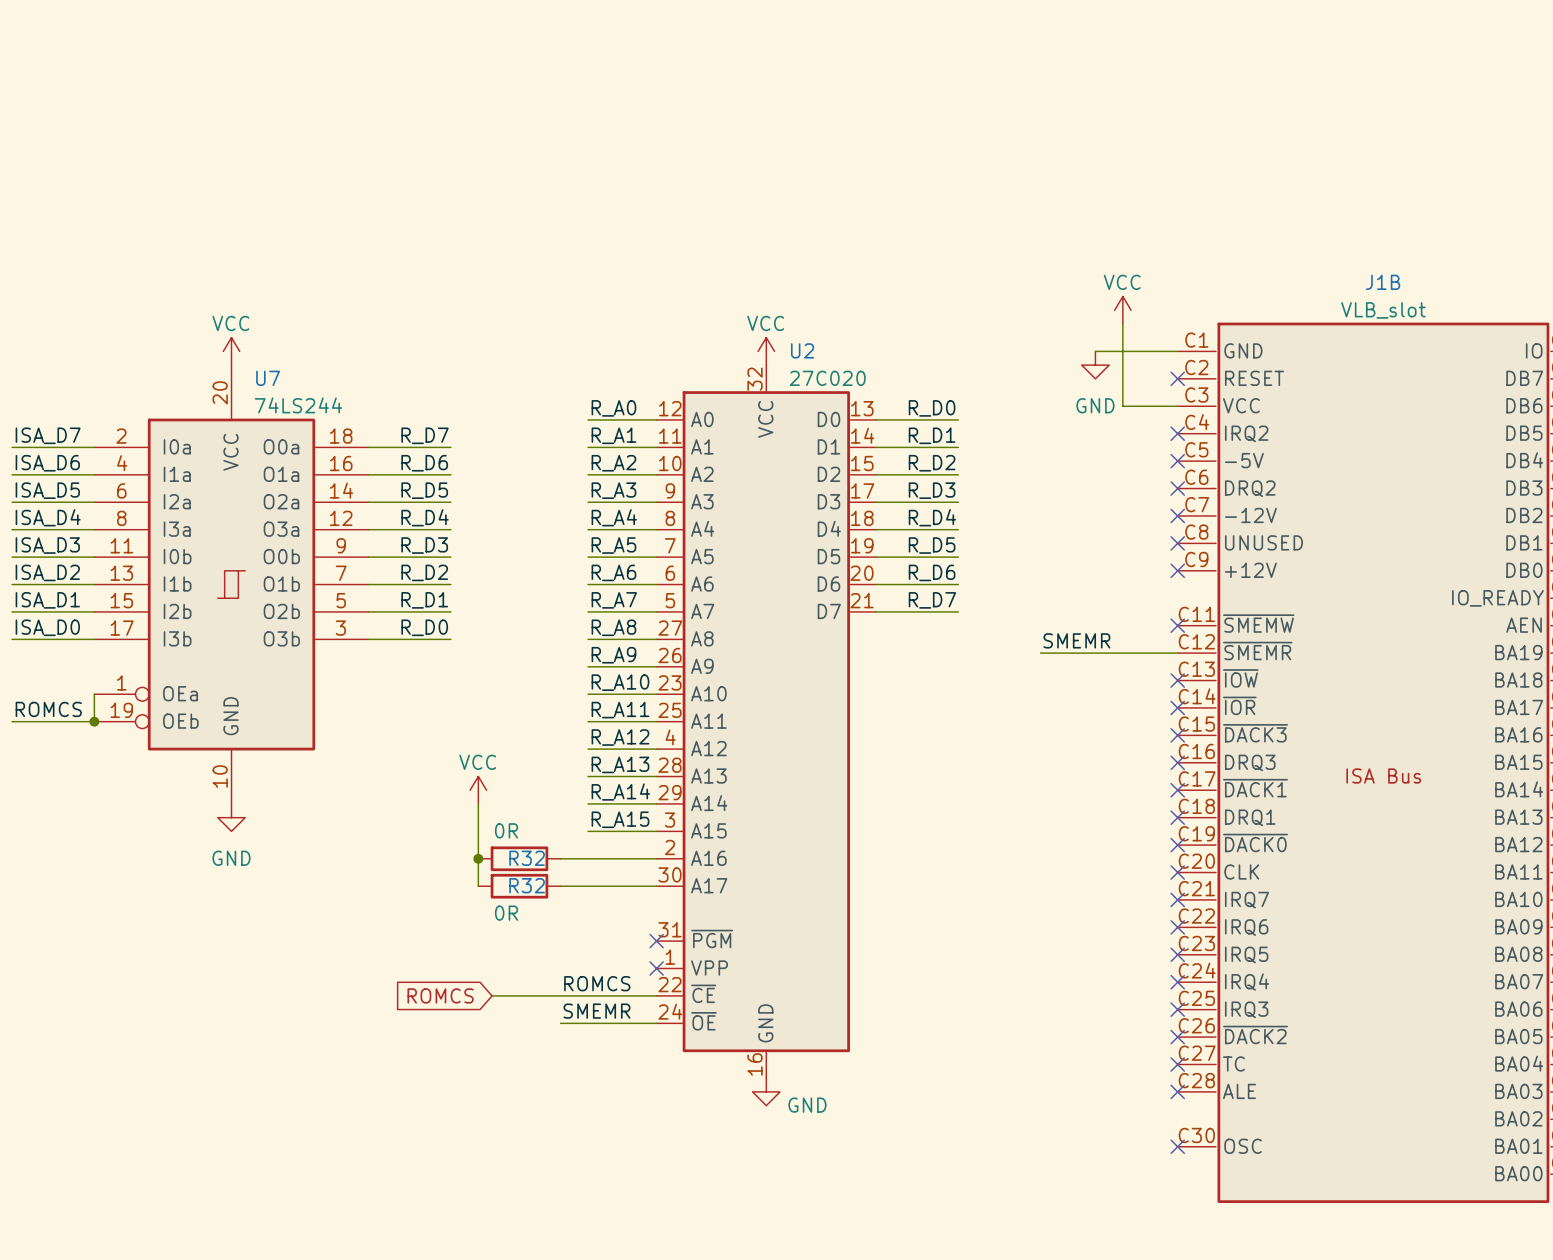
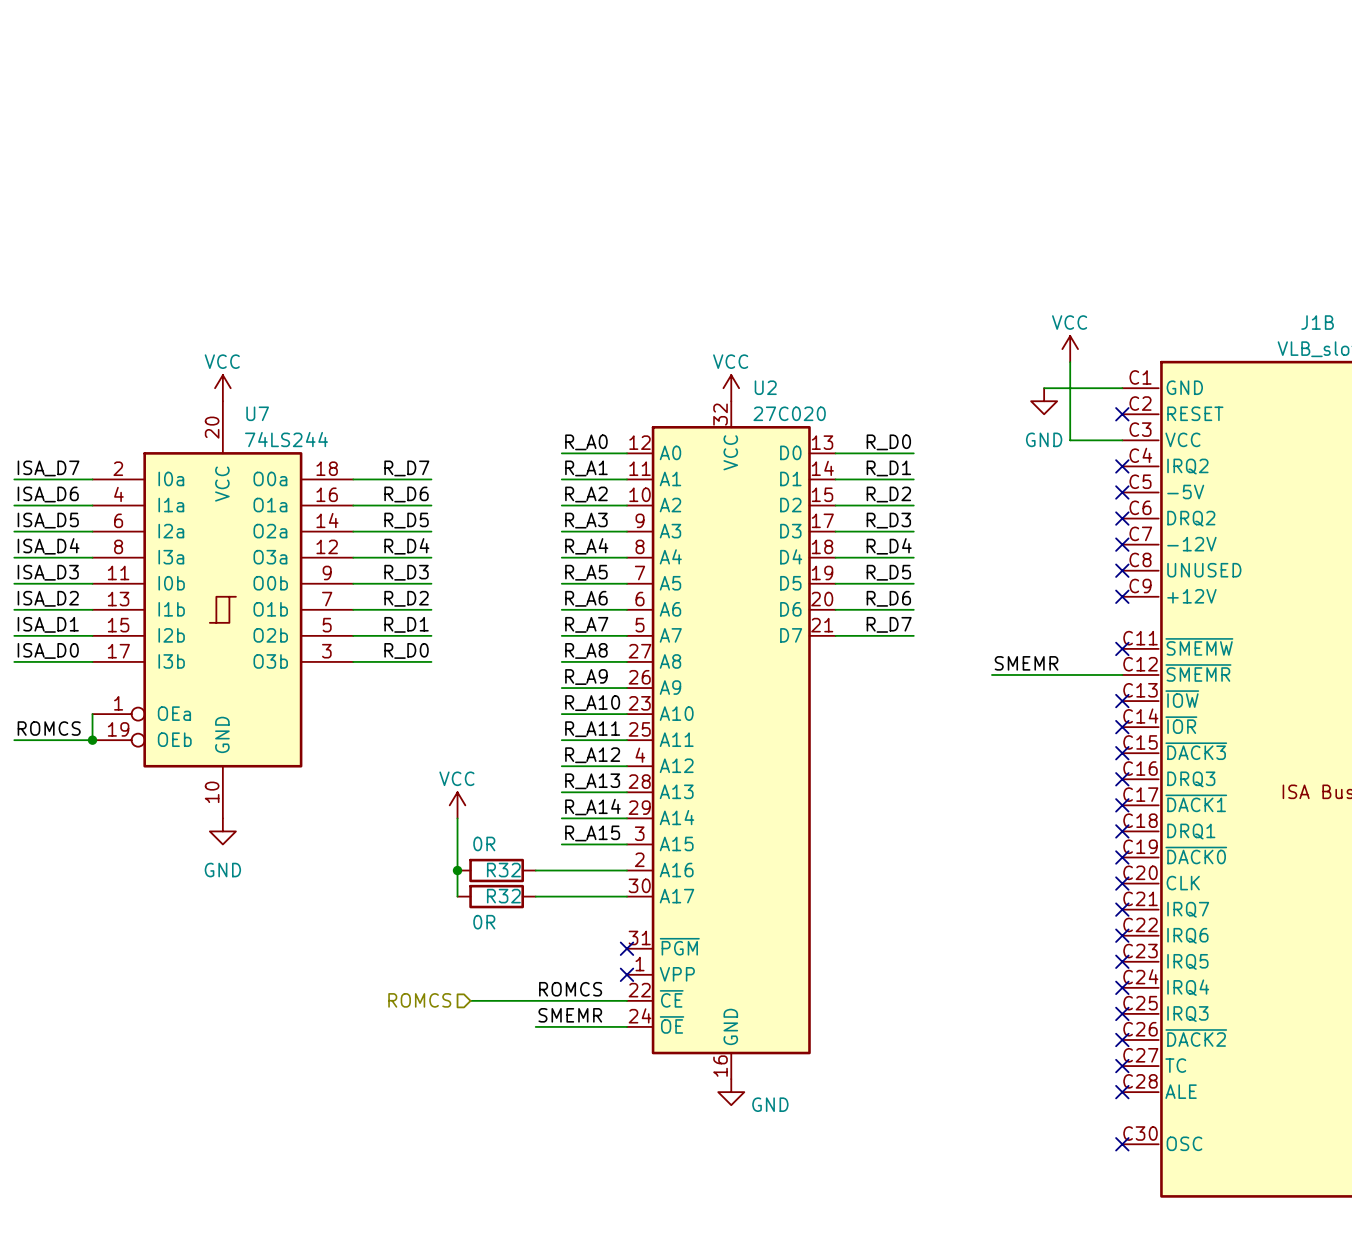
hierarchical label: none -> ROMCS (419, 1000)
global label: ROMCS (440, 995) -> none

